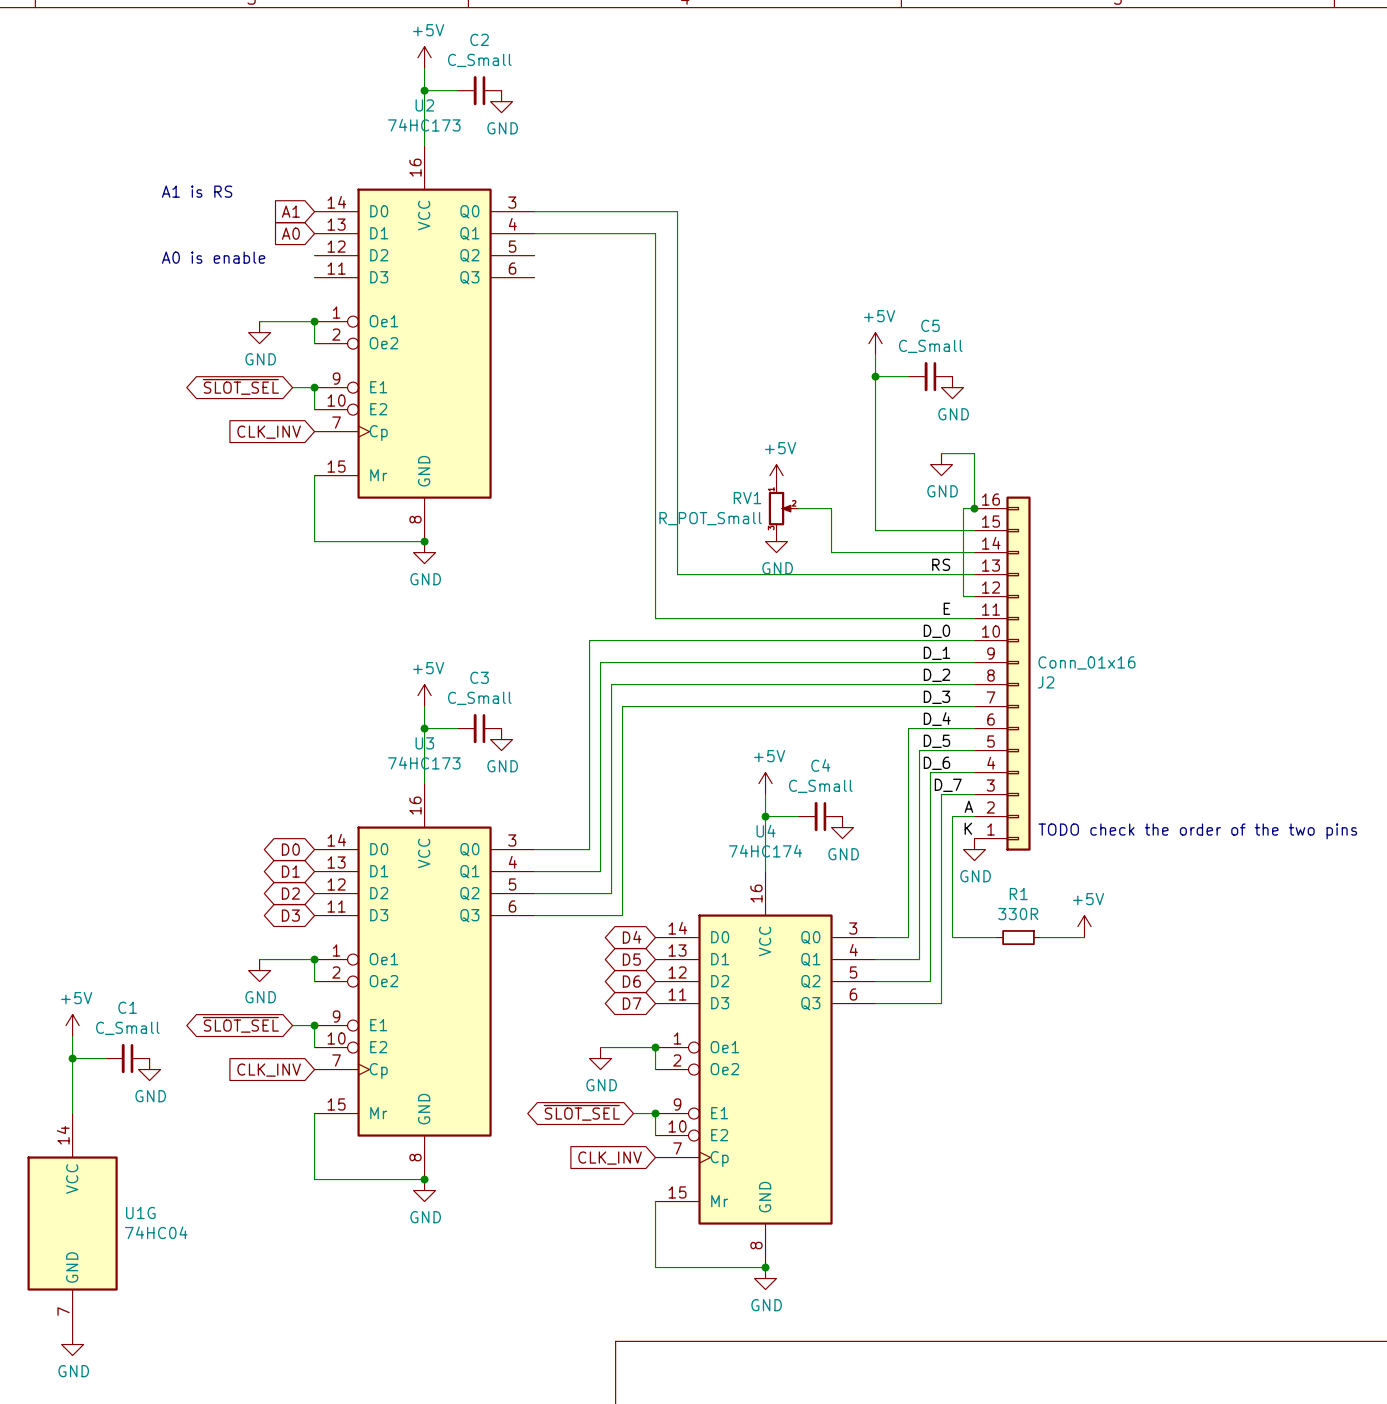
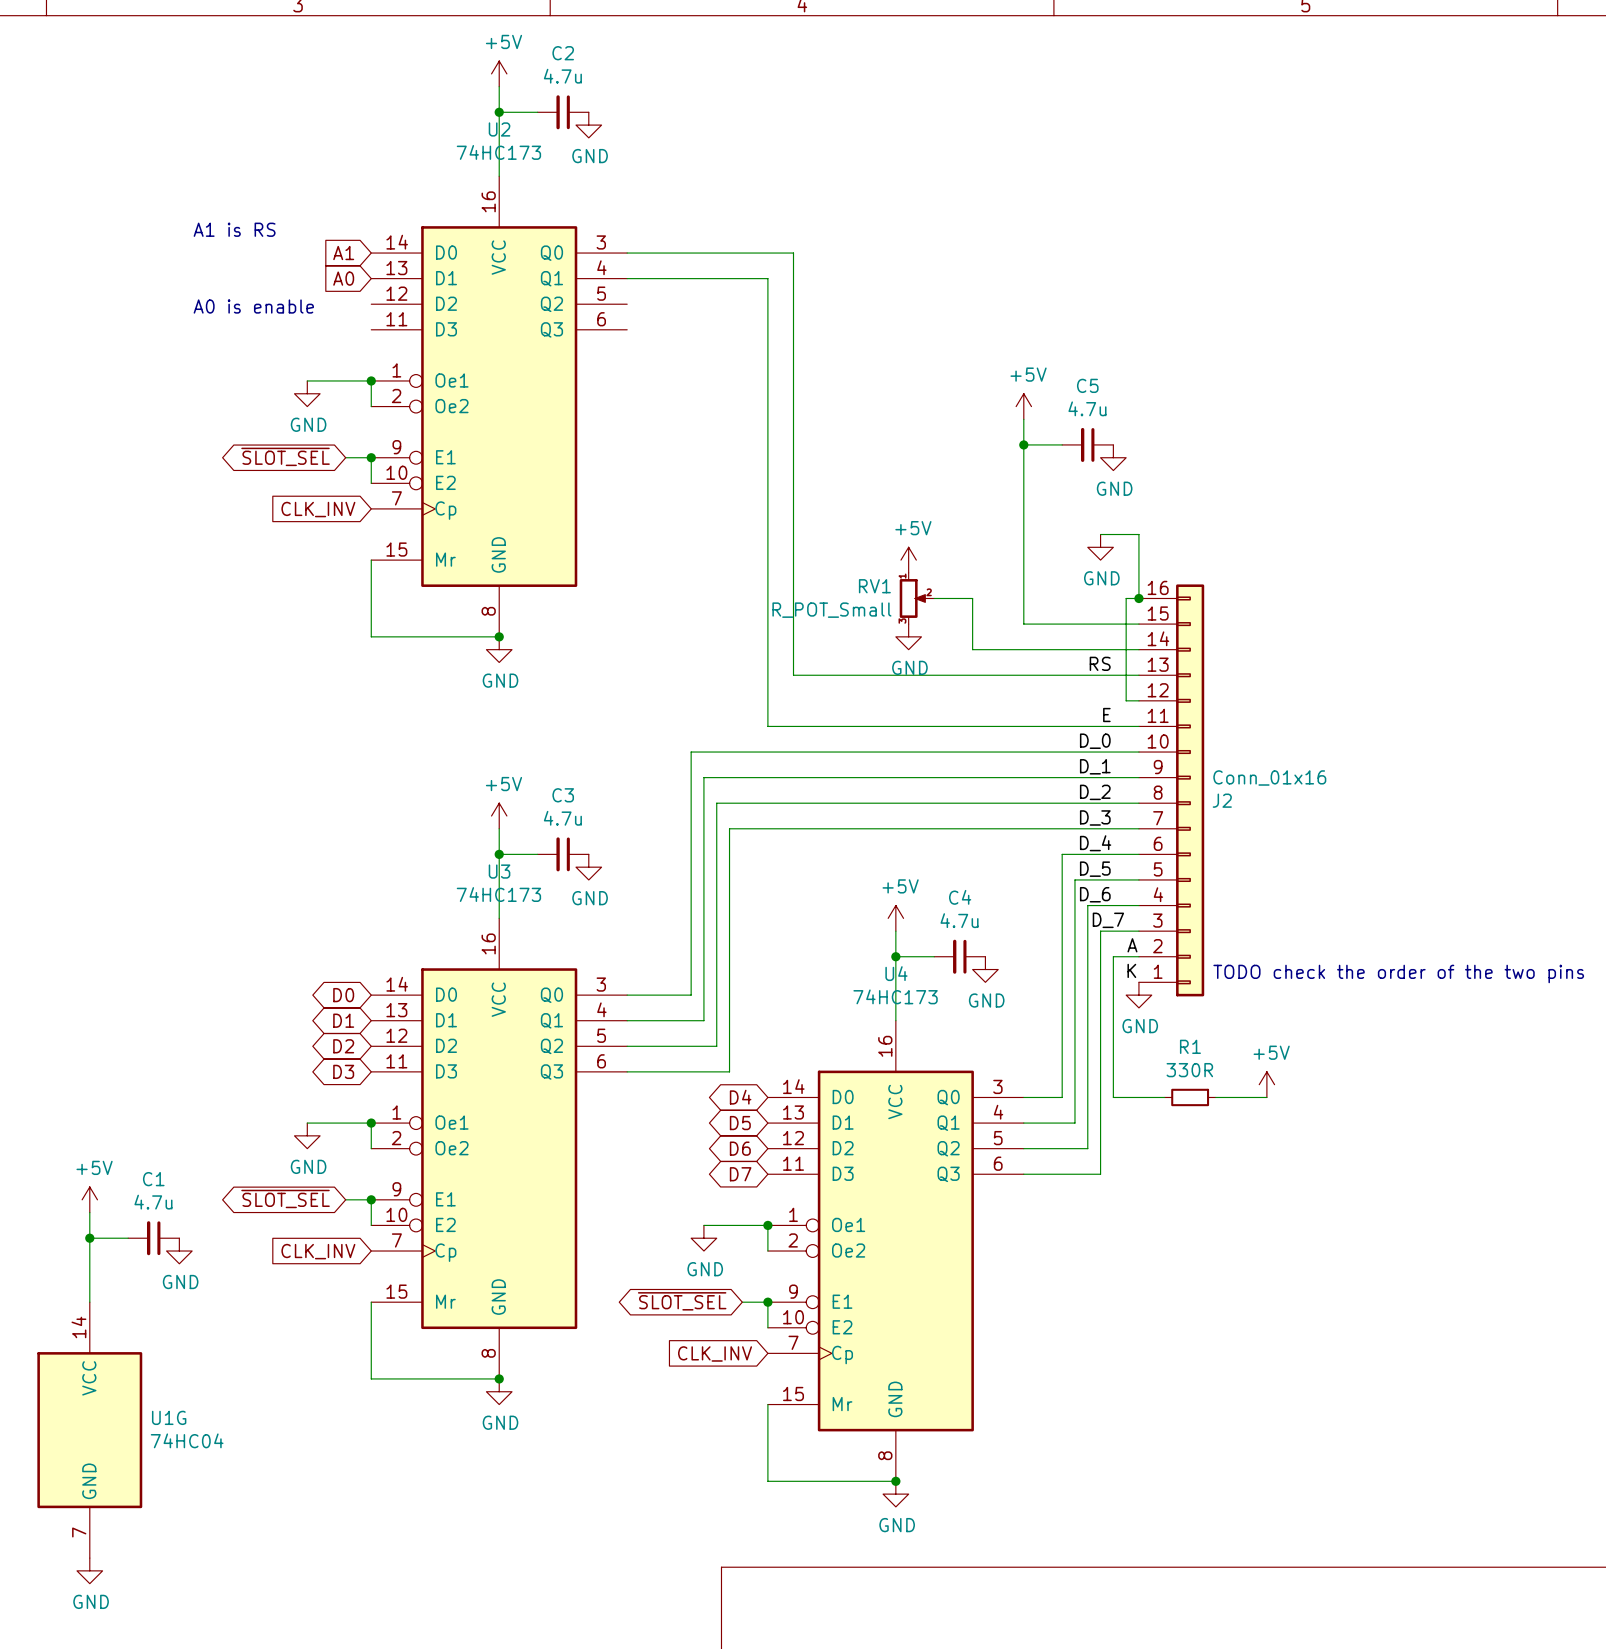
C2 value: C_Small (479, 60) -> 4.7u (562, 76)
C5 value: C_Small (930, 346) -> 4.7u (1087, 408)
C3 value: C_Small (479, 698) -> 4.7u (562, 818)
C4 value: C_Small (820, 786) -> 4.7u (959, 920)
U4 value: 74HC174 (765, 851) -> 74HC173 (895, 996)
C1 value: C_Small (127, 1028) -> 4.7u (153, 1202)

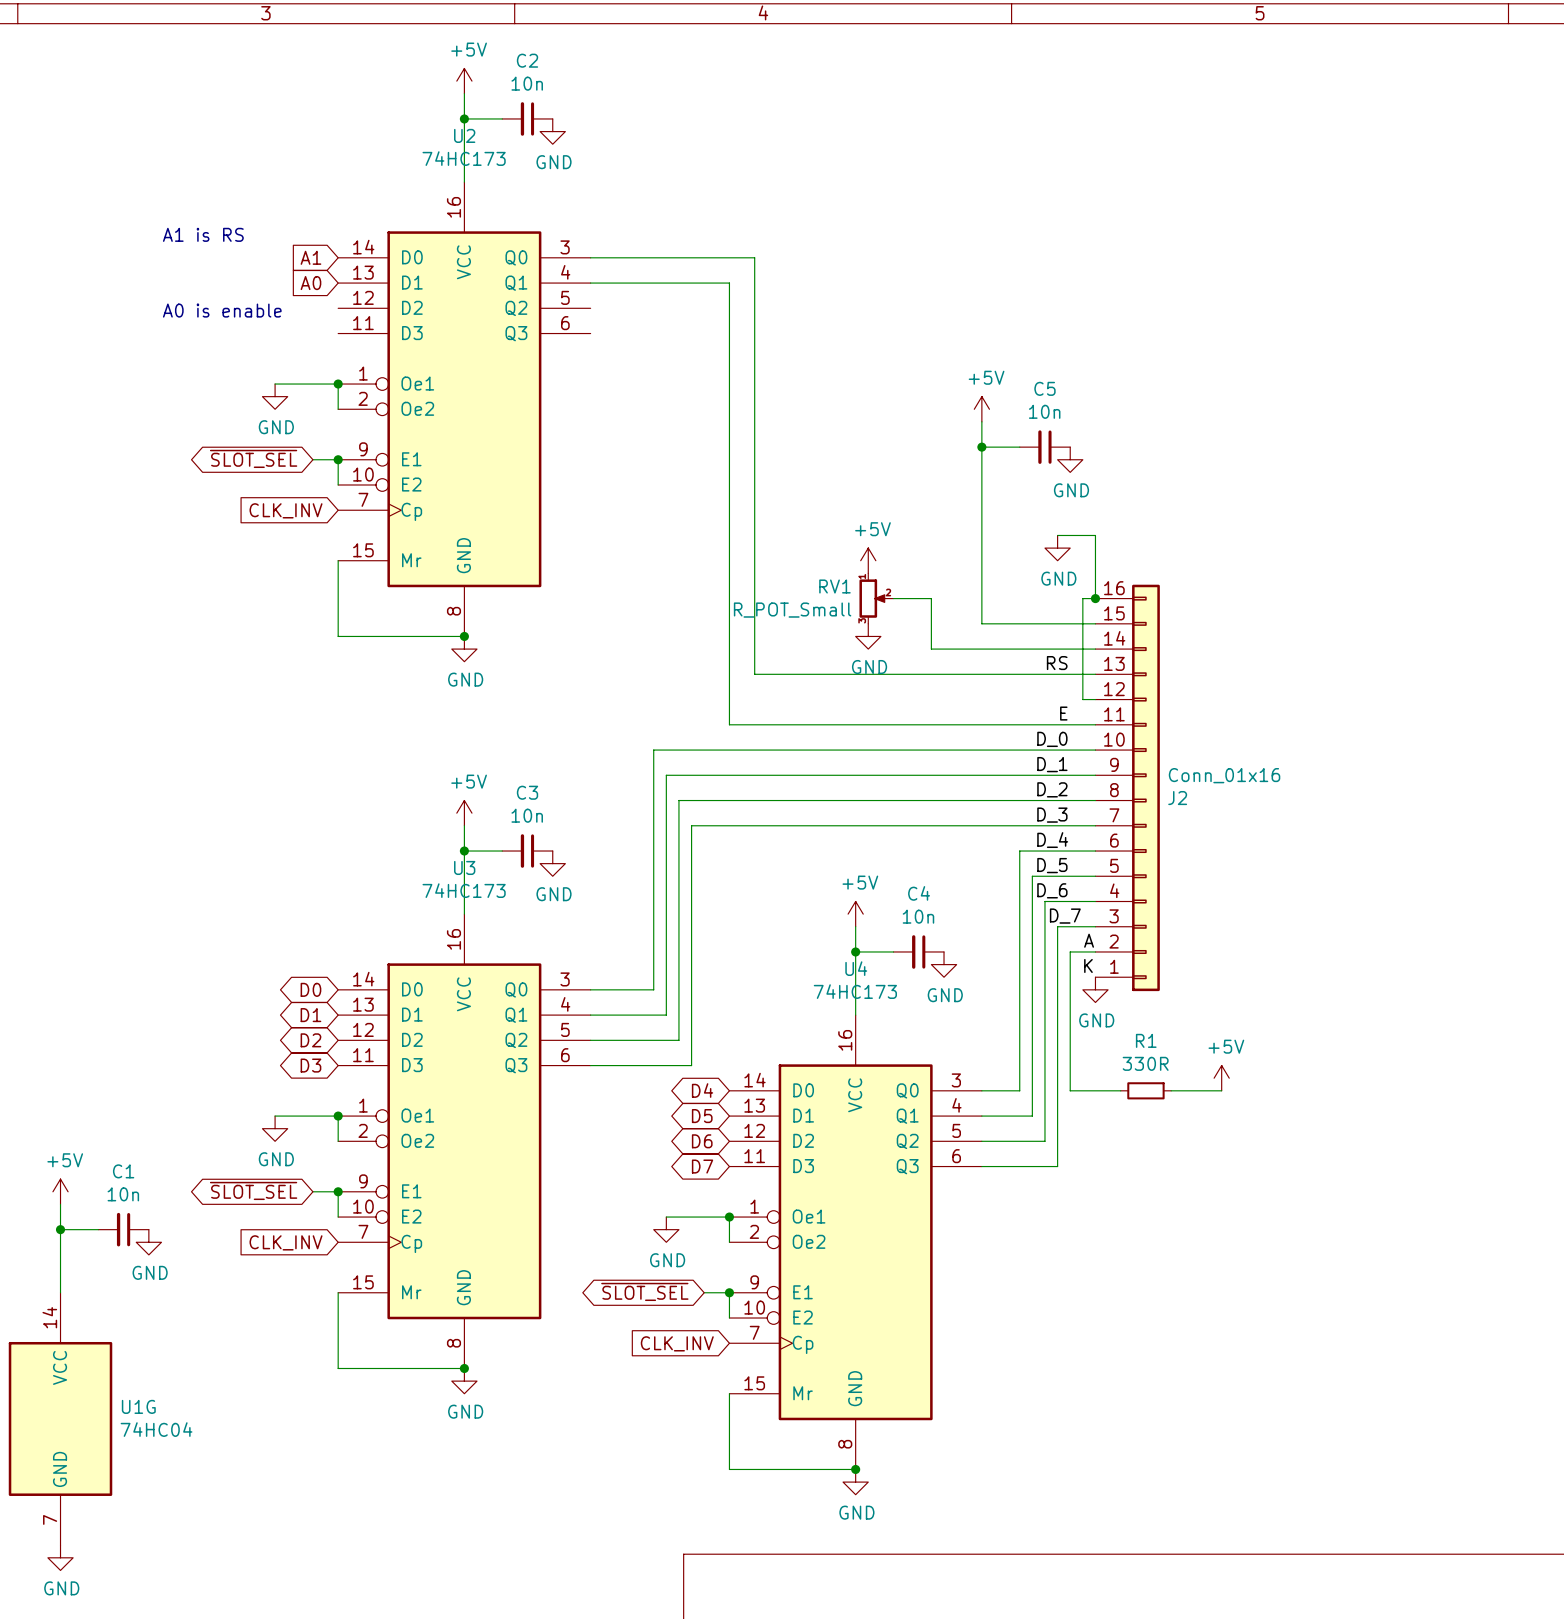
C2 value: 4.7u (562, 76) -> 10n (527, 83)
C5 value: 4.7u (1087, 408) -> 10n (1044, 411)
C3 value: 4.7u (562, 818) -> 10n (527, 815)
C4 value: 4.7u (959, 920) -> 10n (918, 916)
text: TODO check the order of the two pins (1398, 973) -> none
C1 value: 4.7u (153, 1202) -> 10n (123, 1194)

